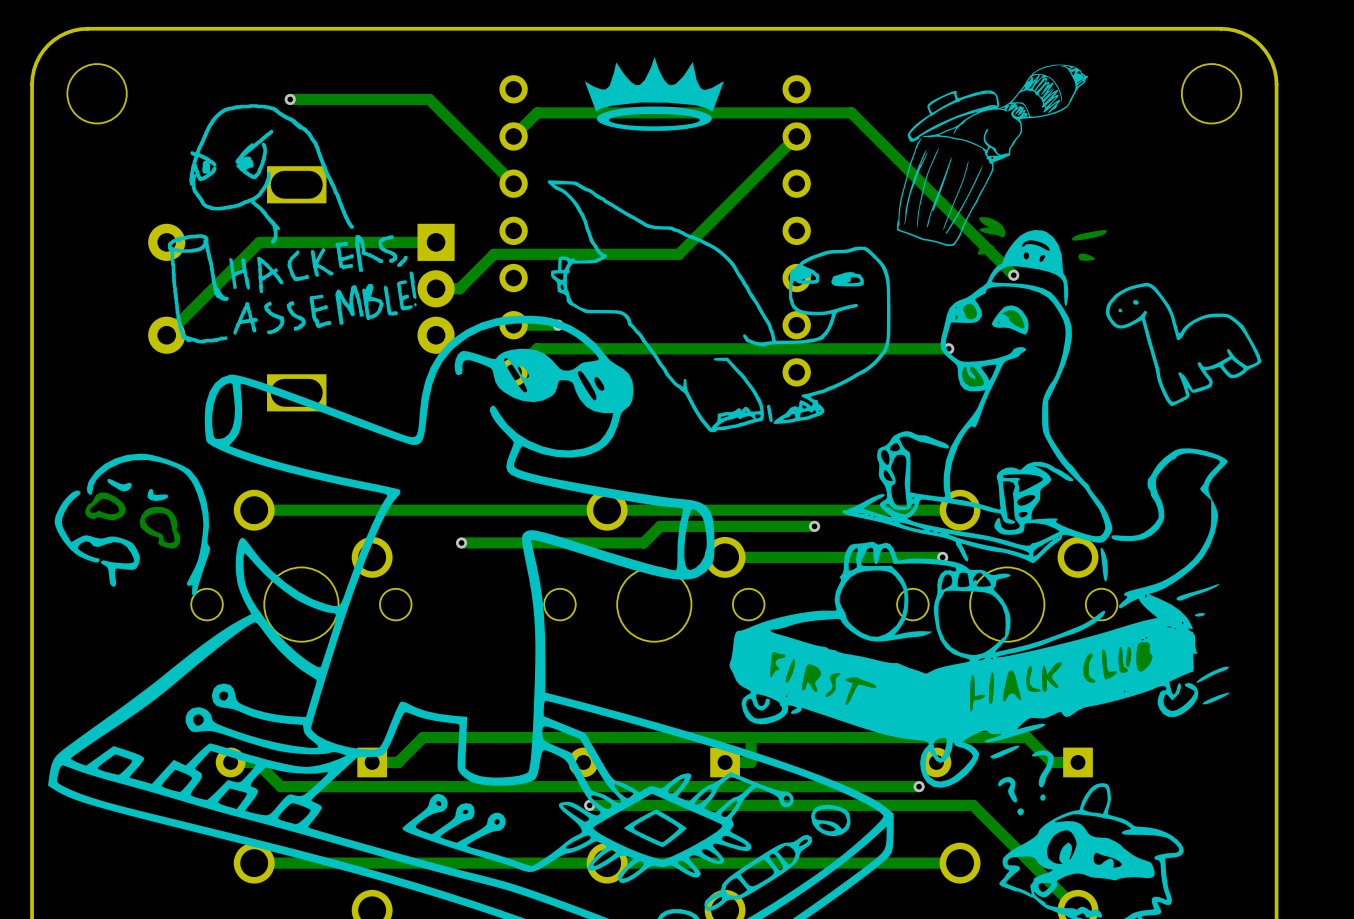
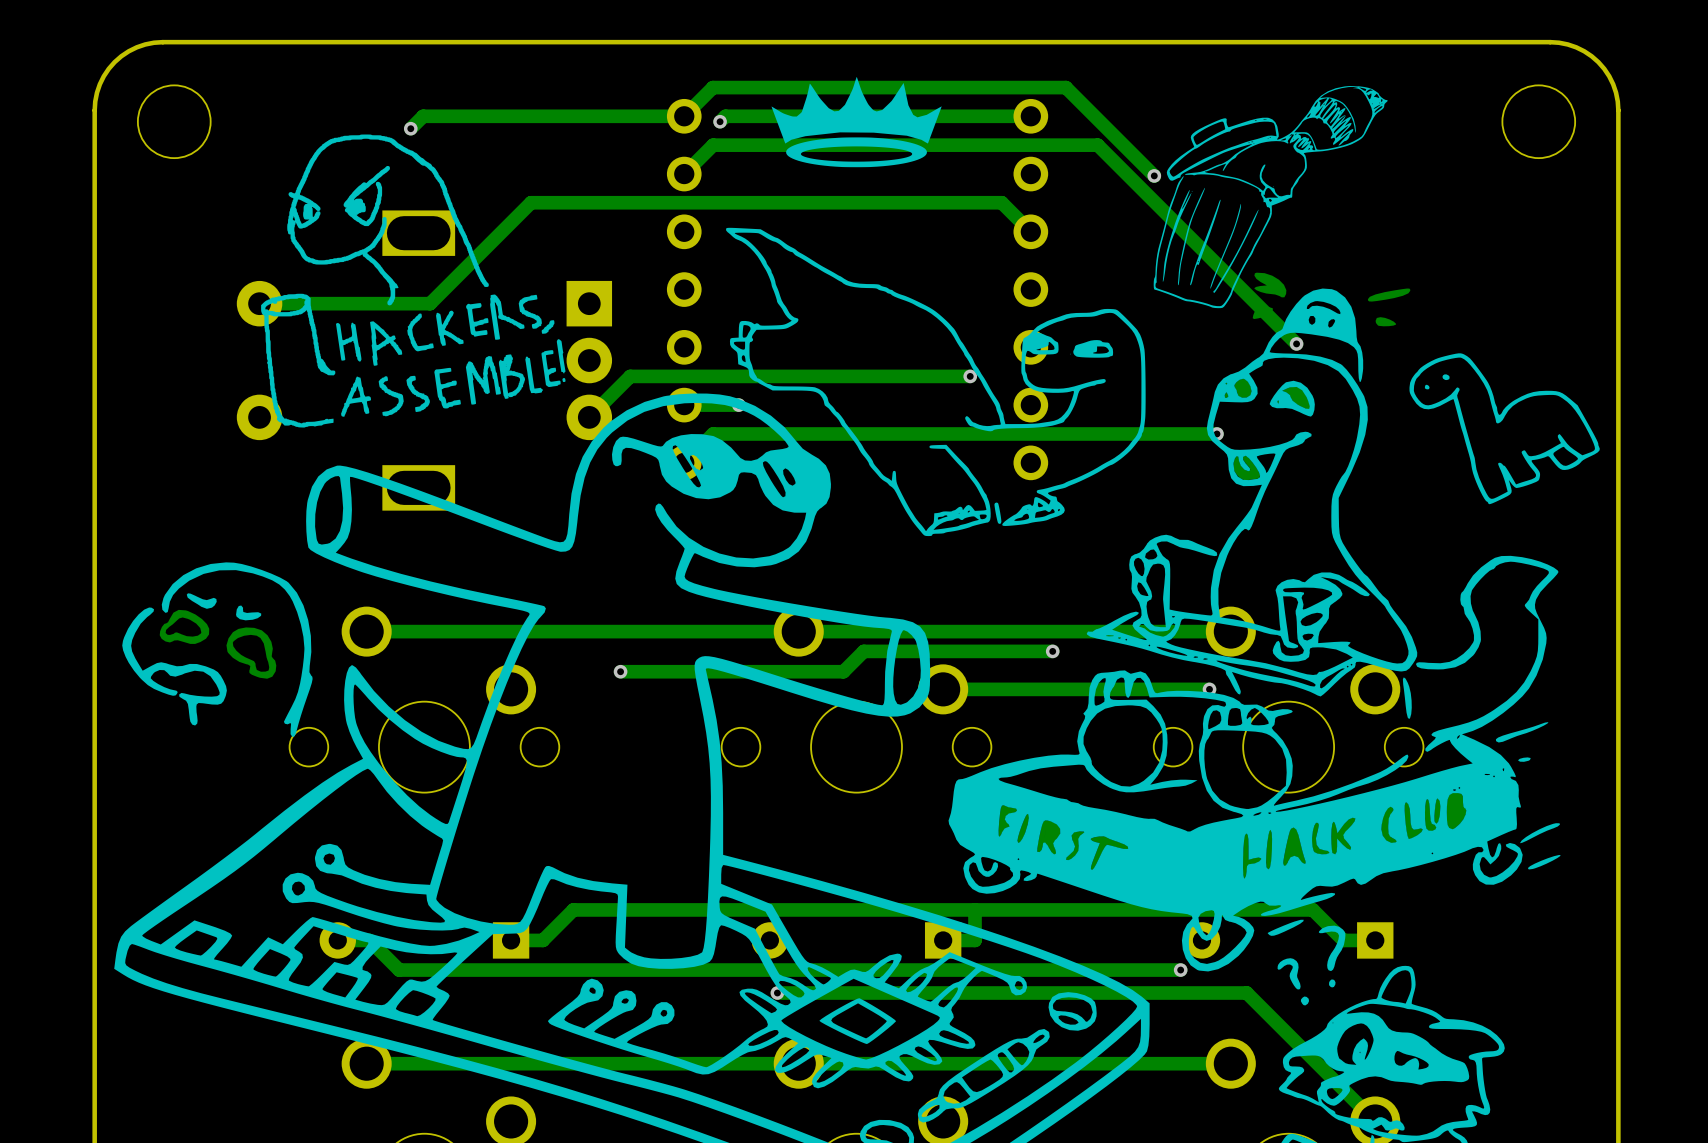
track: none -> (1030, 116) (725, 116) (720, 121)
via: none -> (720, 121)
track: (290, 99) (429, 99) (513, 183) -> (410, 128) (423, 116) (684, 116) (712, 87) (1065, 87) (1154, 175)
track: (796, 136) (678, 254) (494, 254) (459, 288) (436, 288) -> none
via: none -> (1154, 175)
track: (259, 242) (166, 335) -> (373, 303) (259, 303)
track: (436, 242) (306, 242) -> (1030, 231) (1001, 202) (531, 202) (430, 303)
track: none -> (970, 376) (630, 376) (589, 417)
via: none -> (970, 376)

